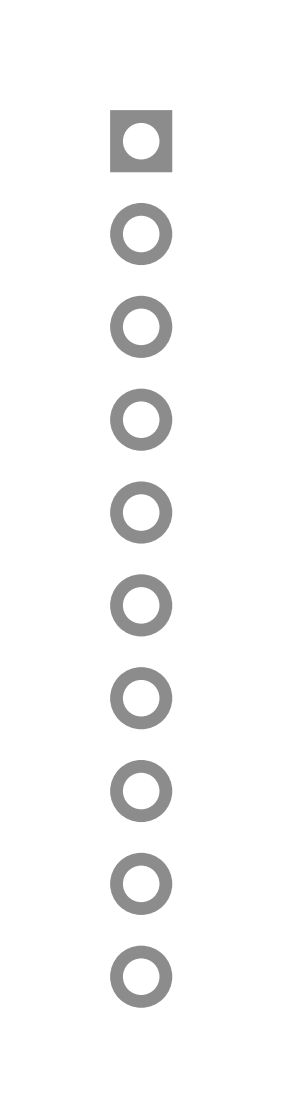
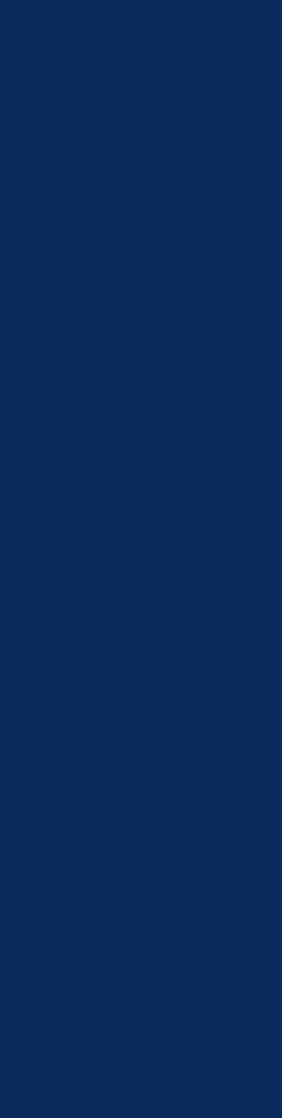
part: (141, 558) -> none

